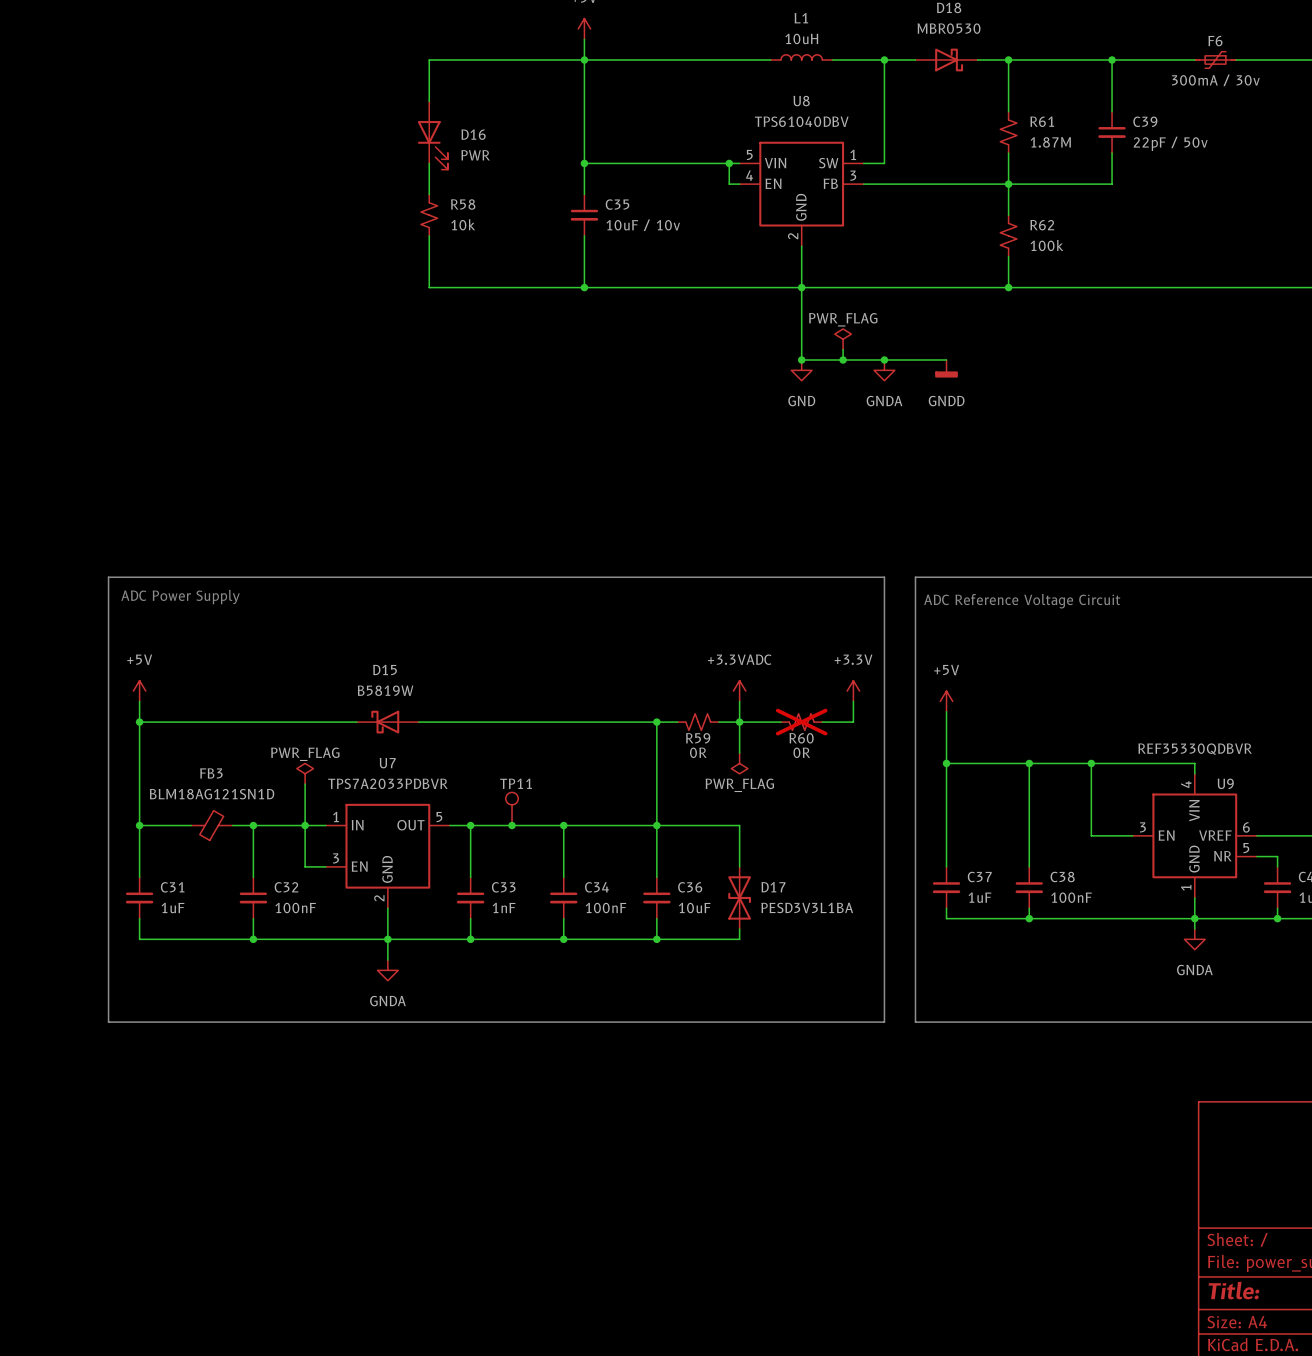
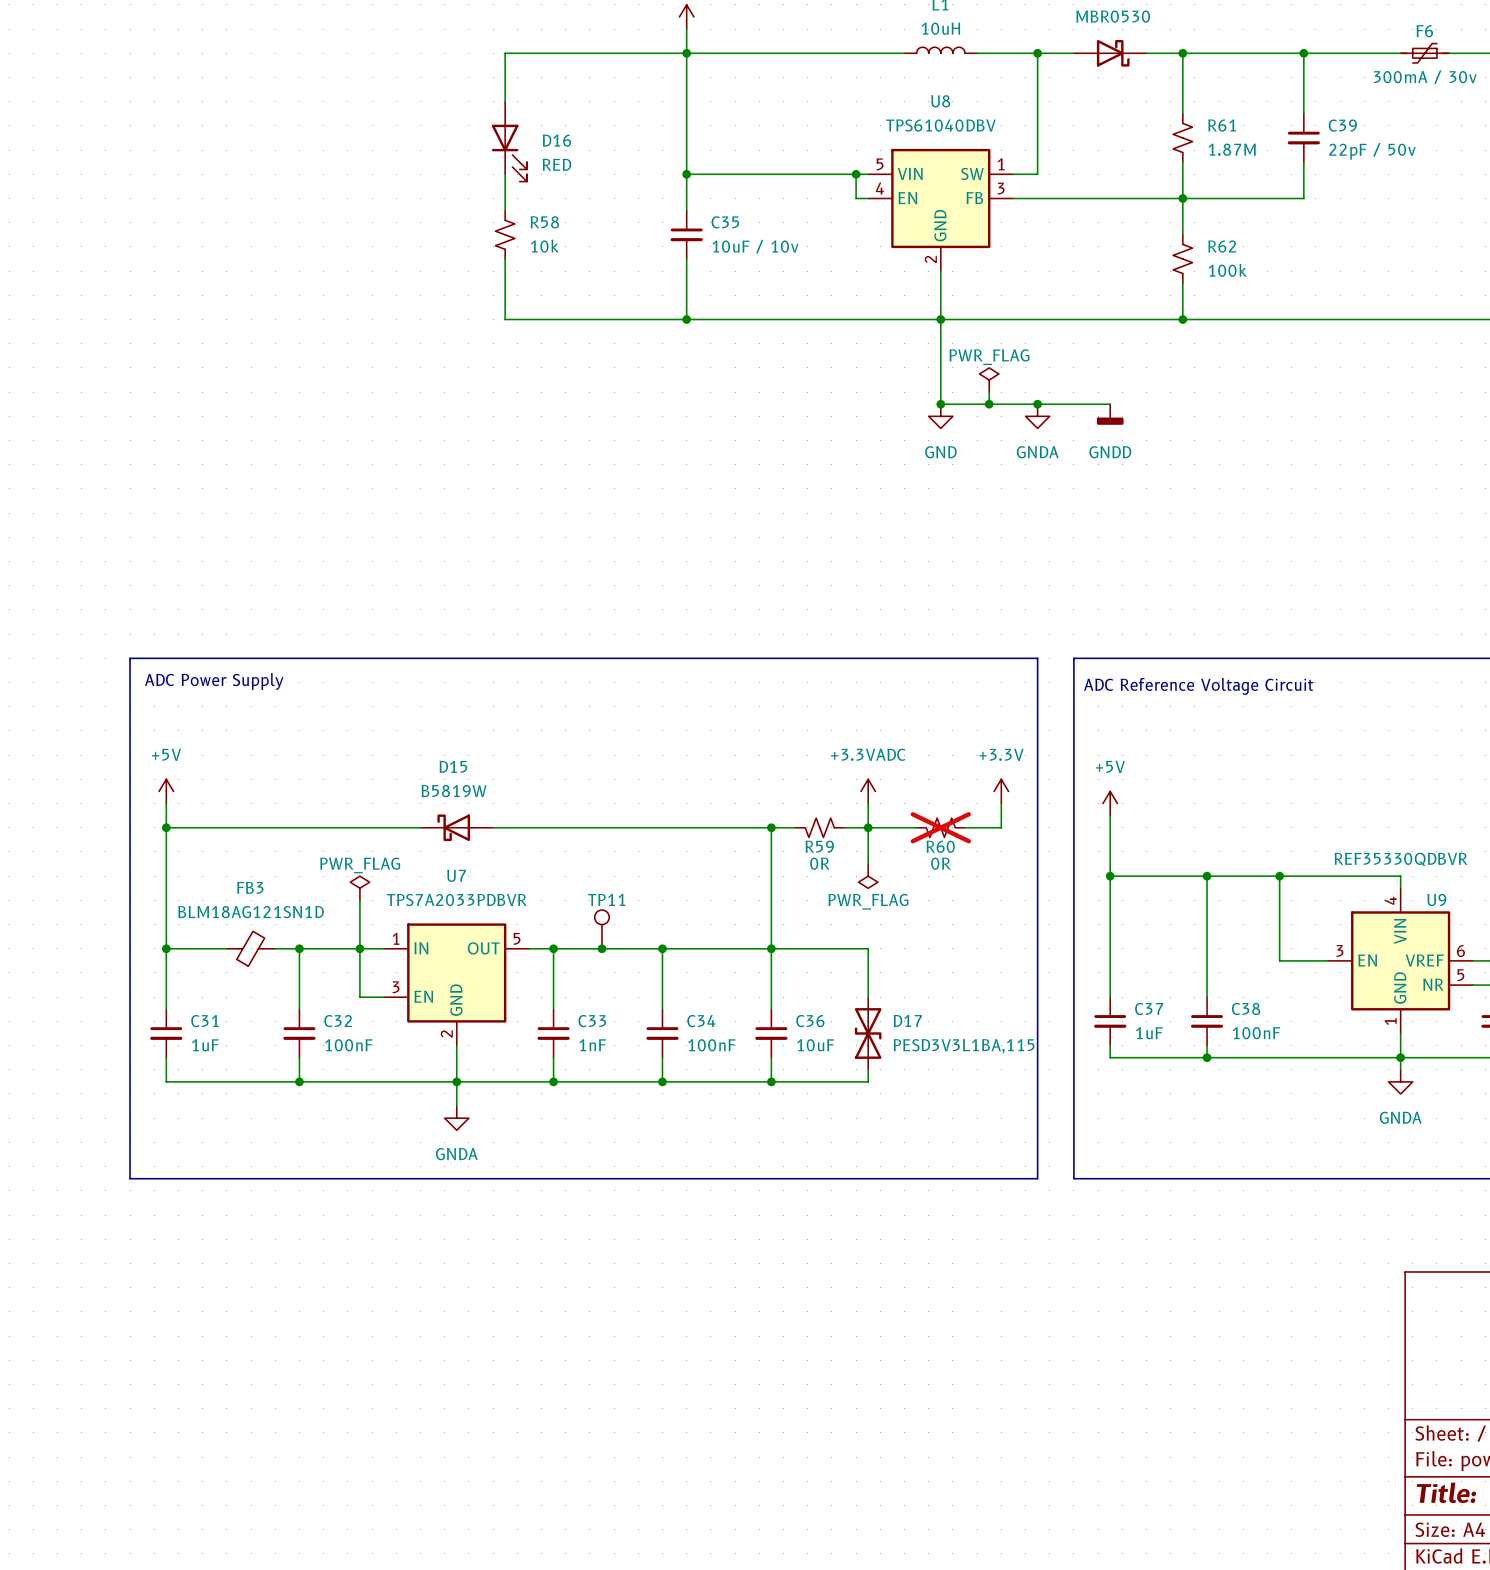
D16 value: PWR (475, 155) -> RED (556, 164)
D17 value: PESD3V3L1BA (807, 907) -> PESD3V3L1BA,115 (964, 1046)

